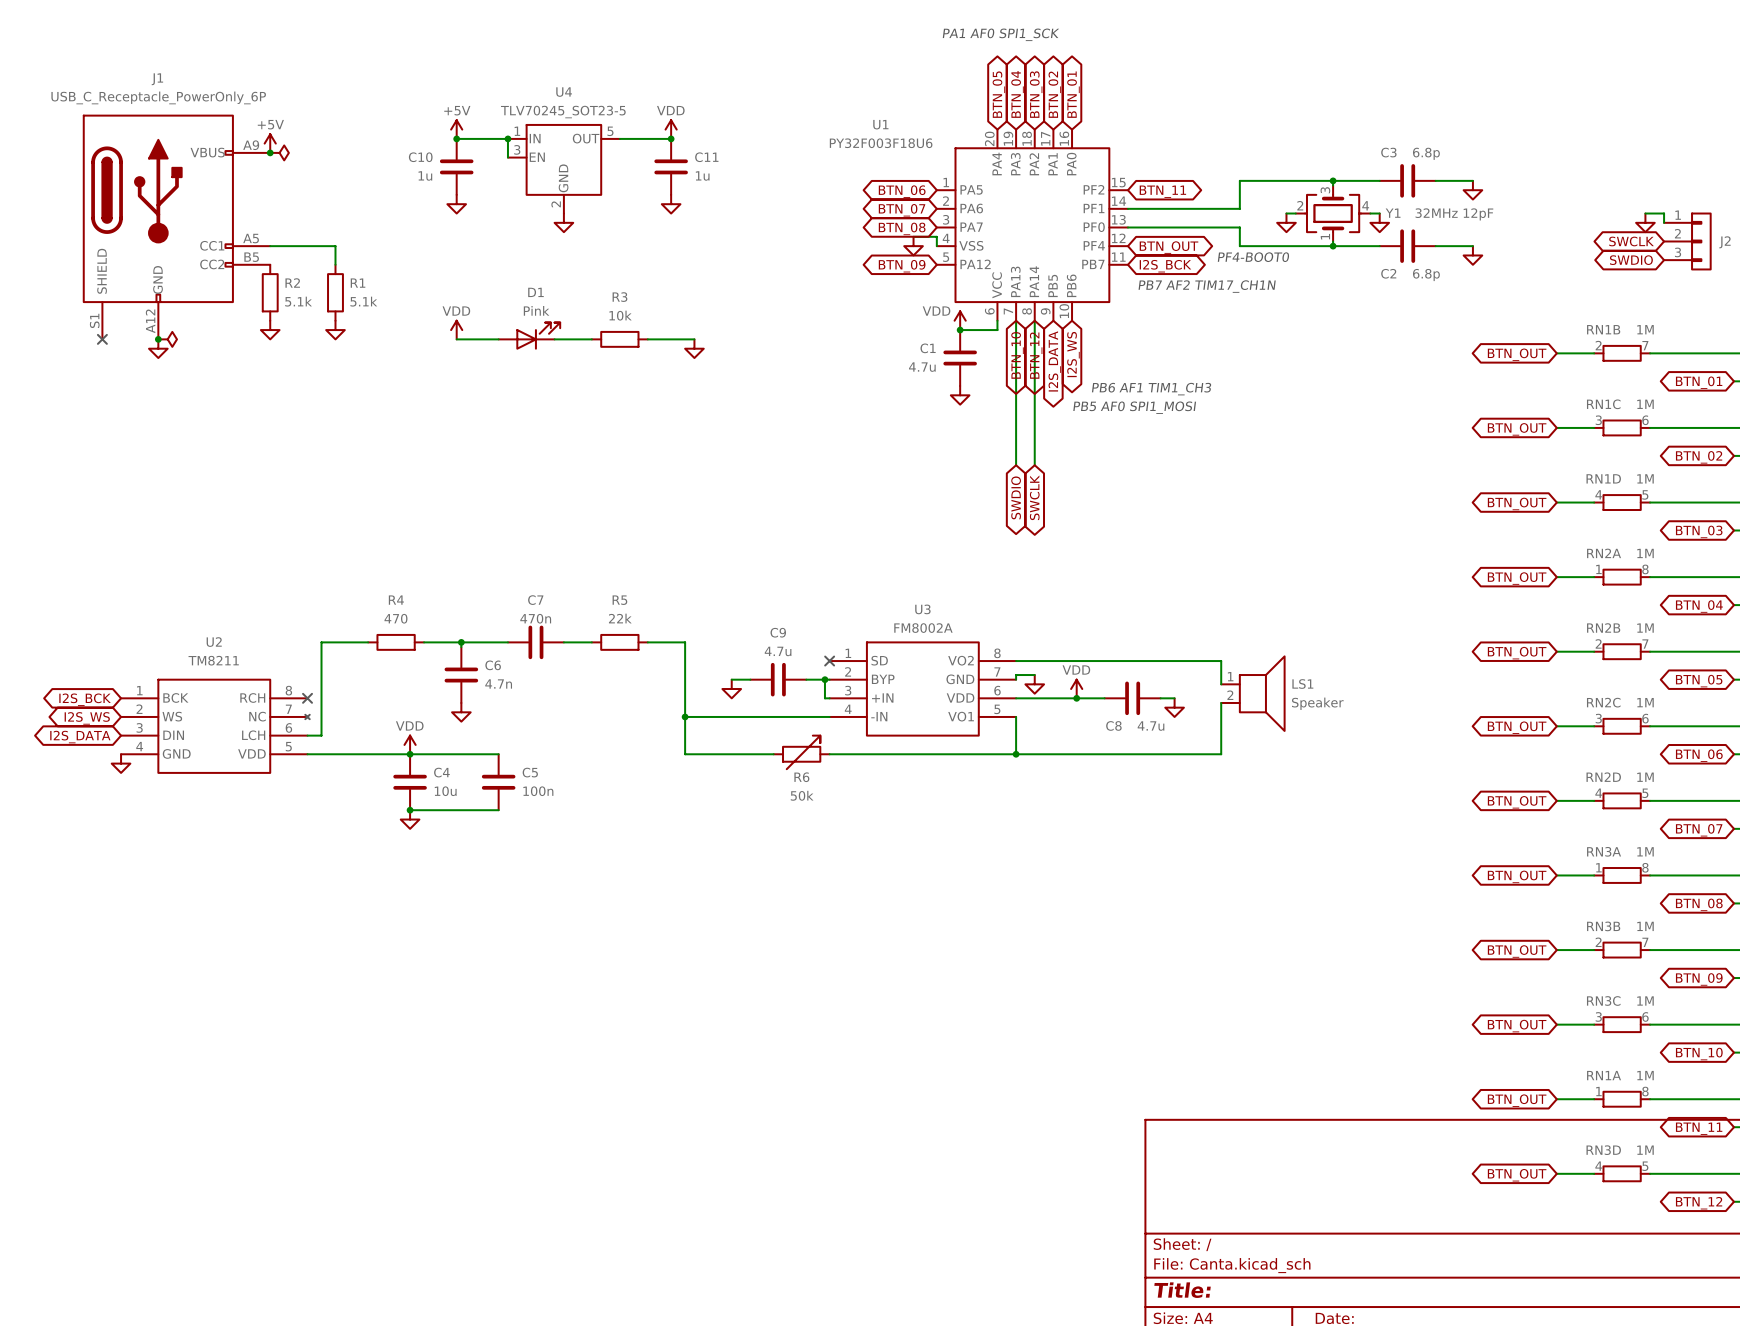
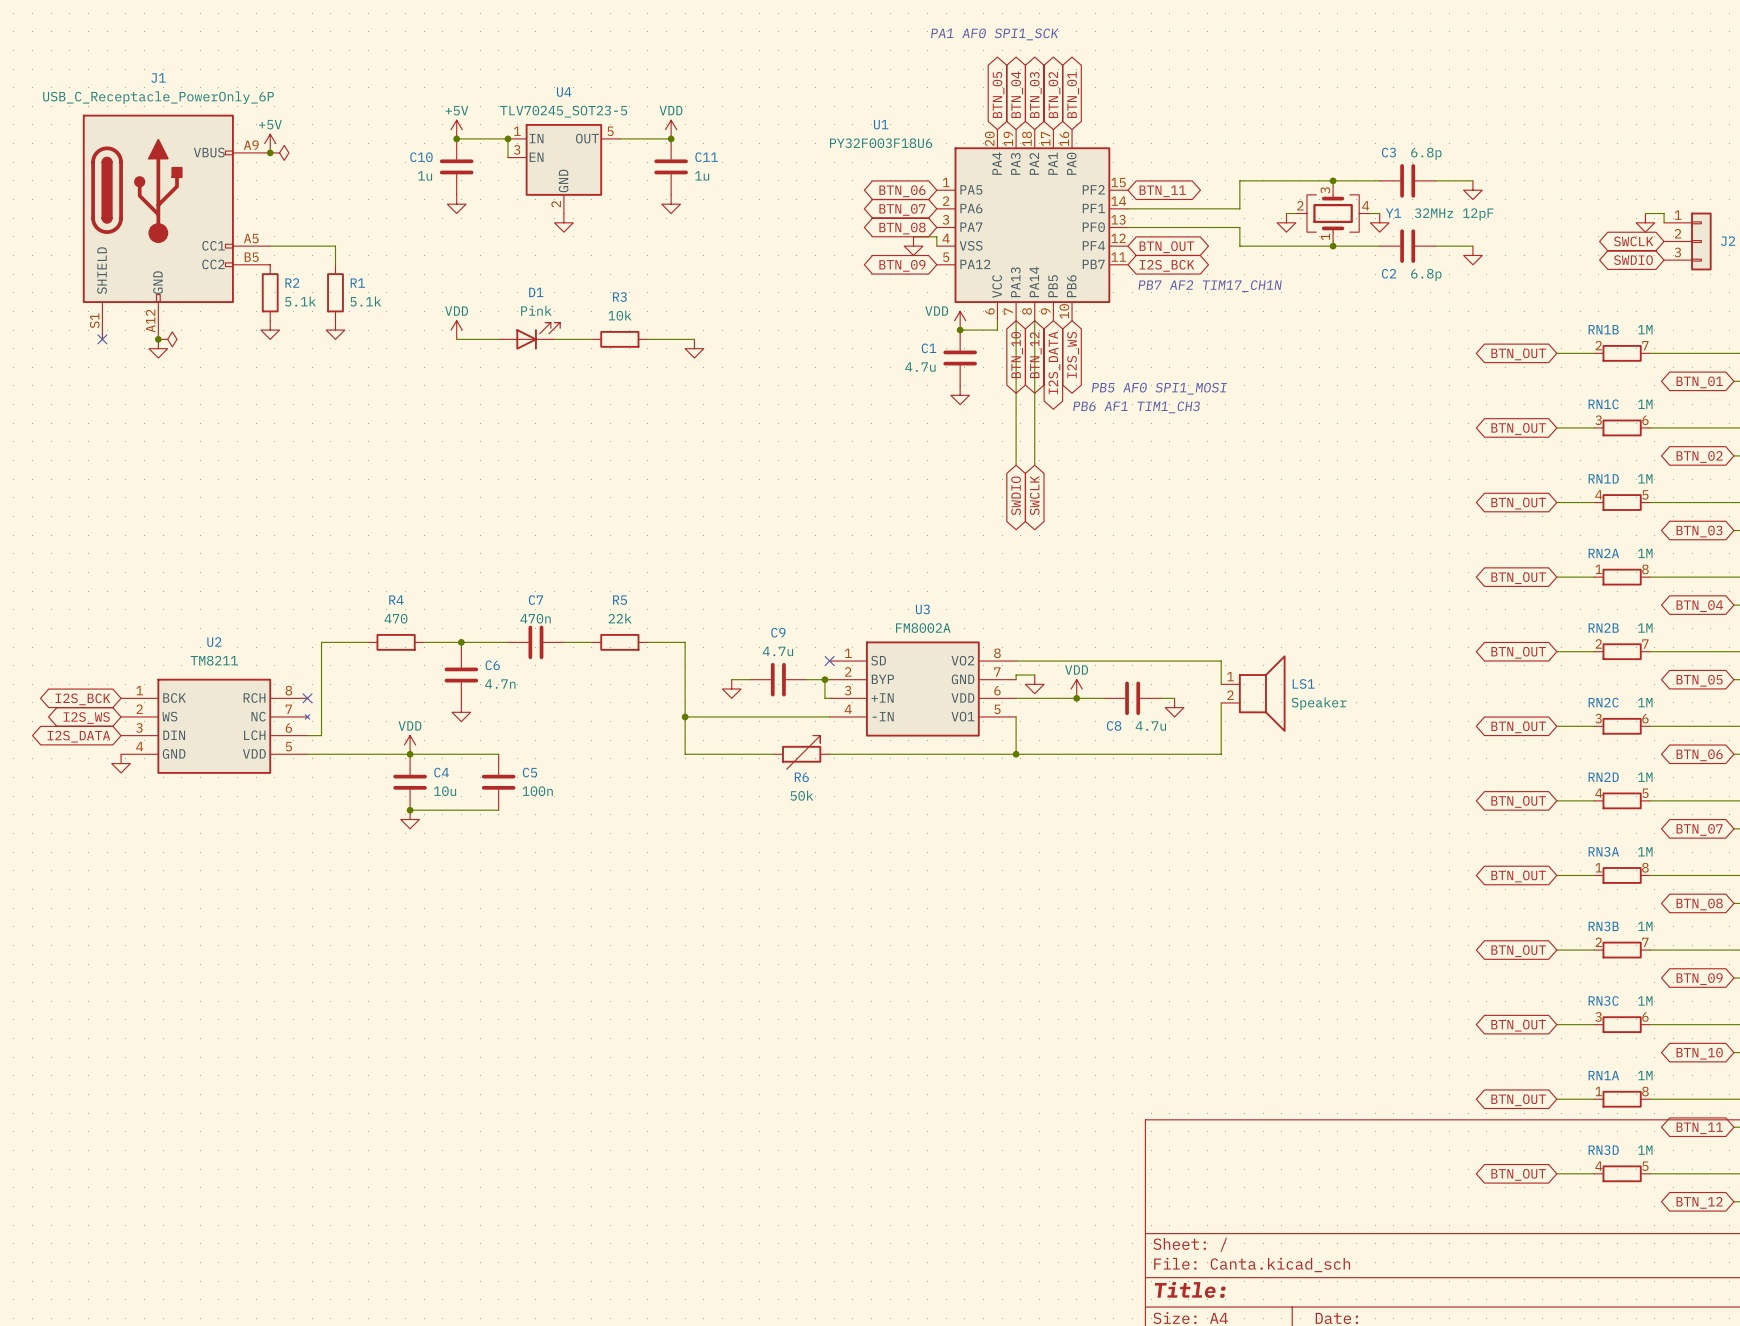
text: PF4-BOOT0 (1253, 257) -> none
text: PB6 AF1 TIM1_CH3 (1151, 389) -> PB5 AF0 SPI1_MOSI (1159, 388)
text: PB5 AF0 SPI1_MOSI (1134, 407) -> PB6 AF1 TIM1_CH3 (1136, 407)

